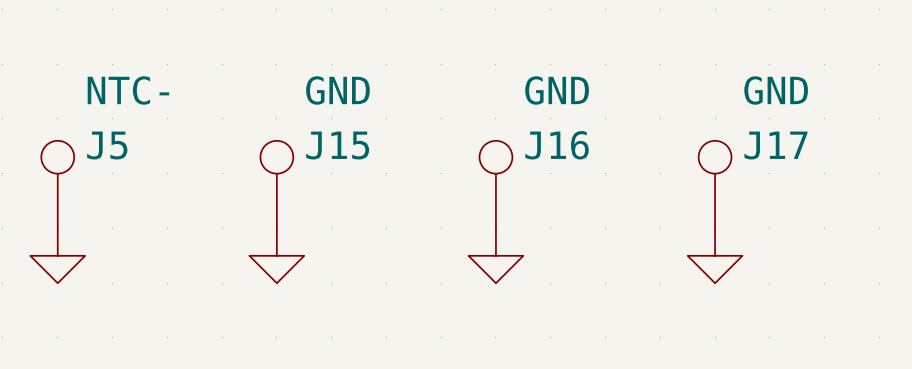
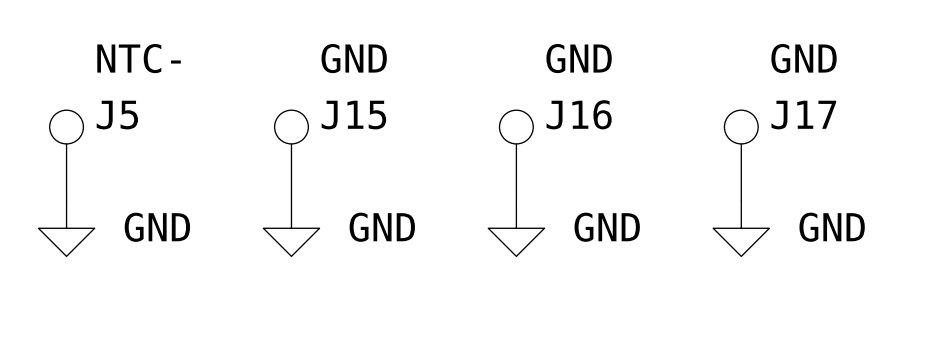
power symbol text: none -> GND (157, 227)
power symbol text: none -> GND (382, 227)
power symbol text: none -> GND (607, 227)
power symbol text: none -> GND (832, 227)

